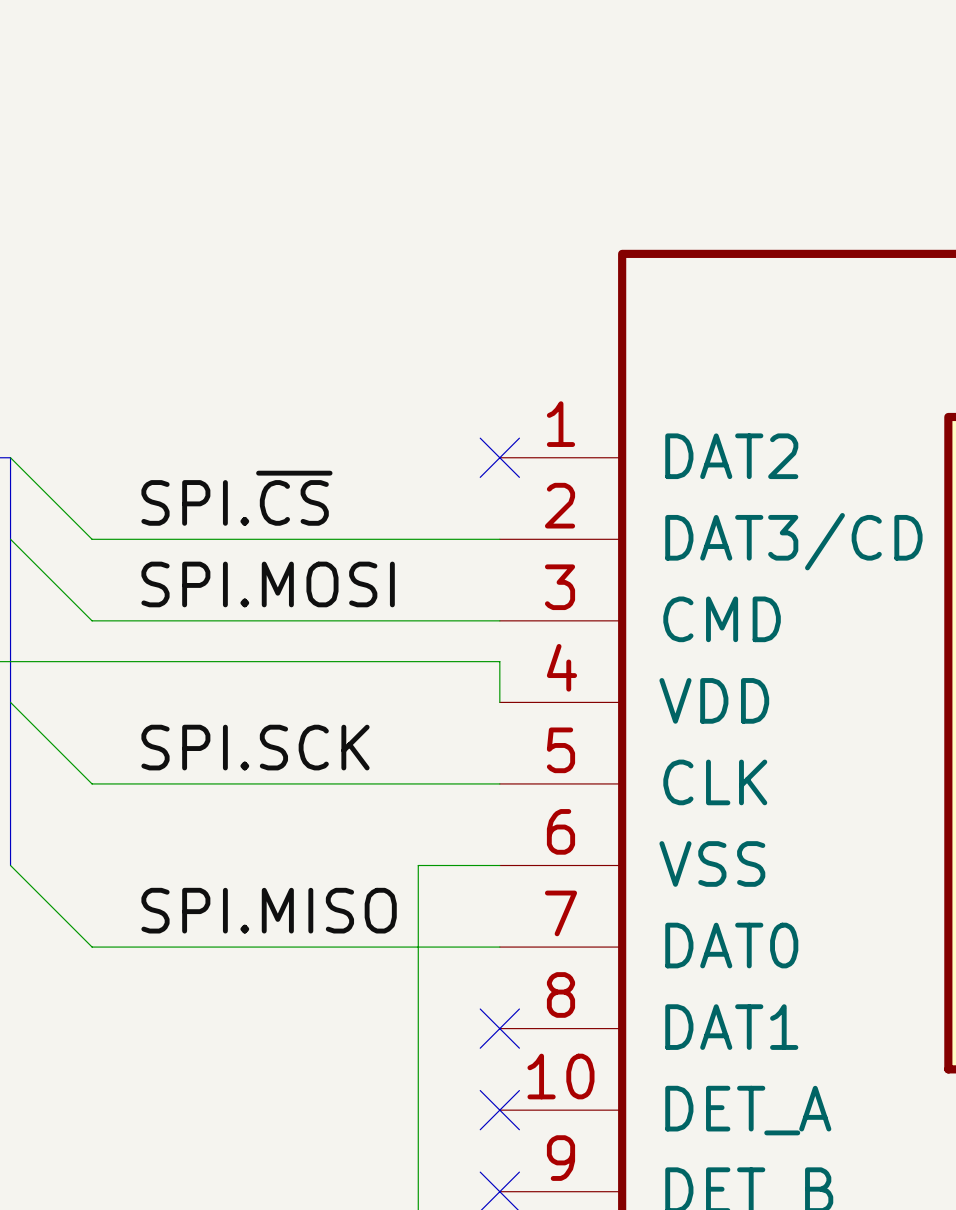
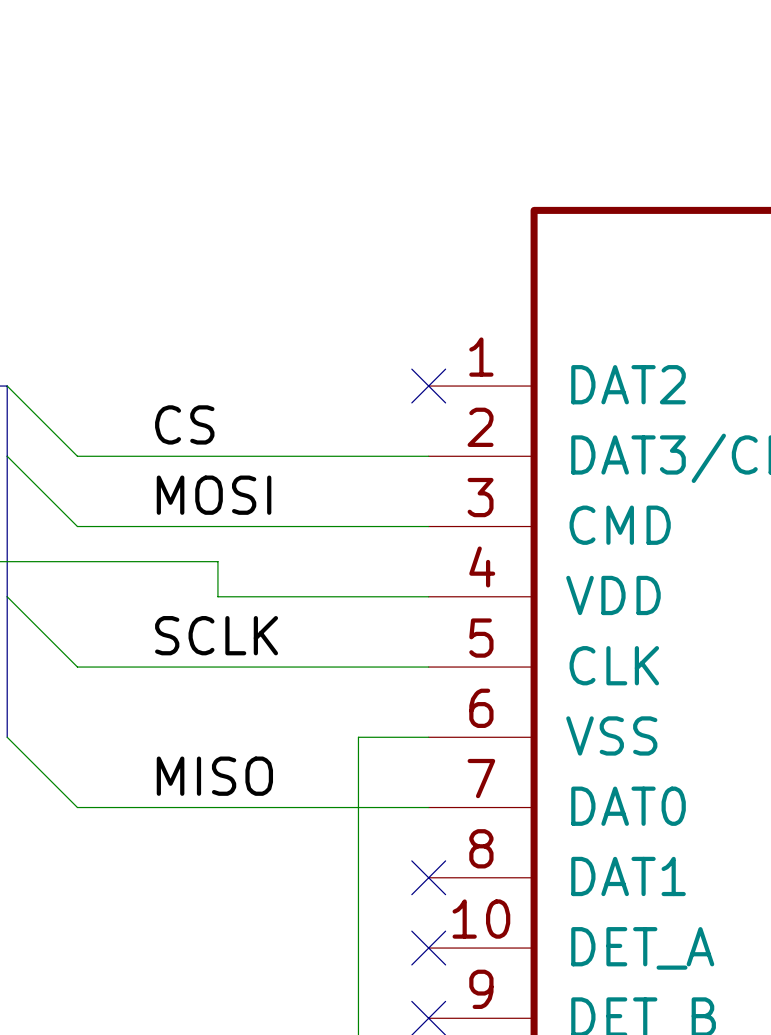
label: SPI.~{CS} (236, 498) -> none
label: none -> CS (184, 424)
label: SPI.MOSI (268, 584) -> MOSI (214, 495)
wire: (255, 661) (499, 661) (499, 702) -> (217, 561) (217, 596) (428, 596)
label: none -> SCLK (216, 635)
label: SPI.SCK (255, 747) -> none
label: SPI.MISO (269, 910) -> MISO (214, 776)

